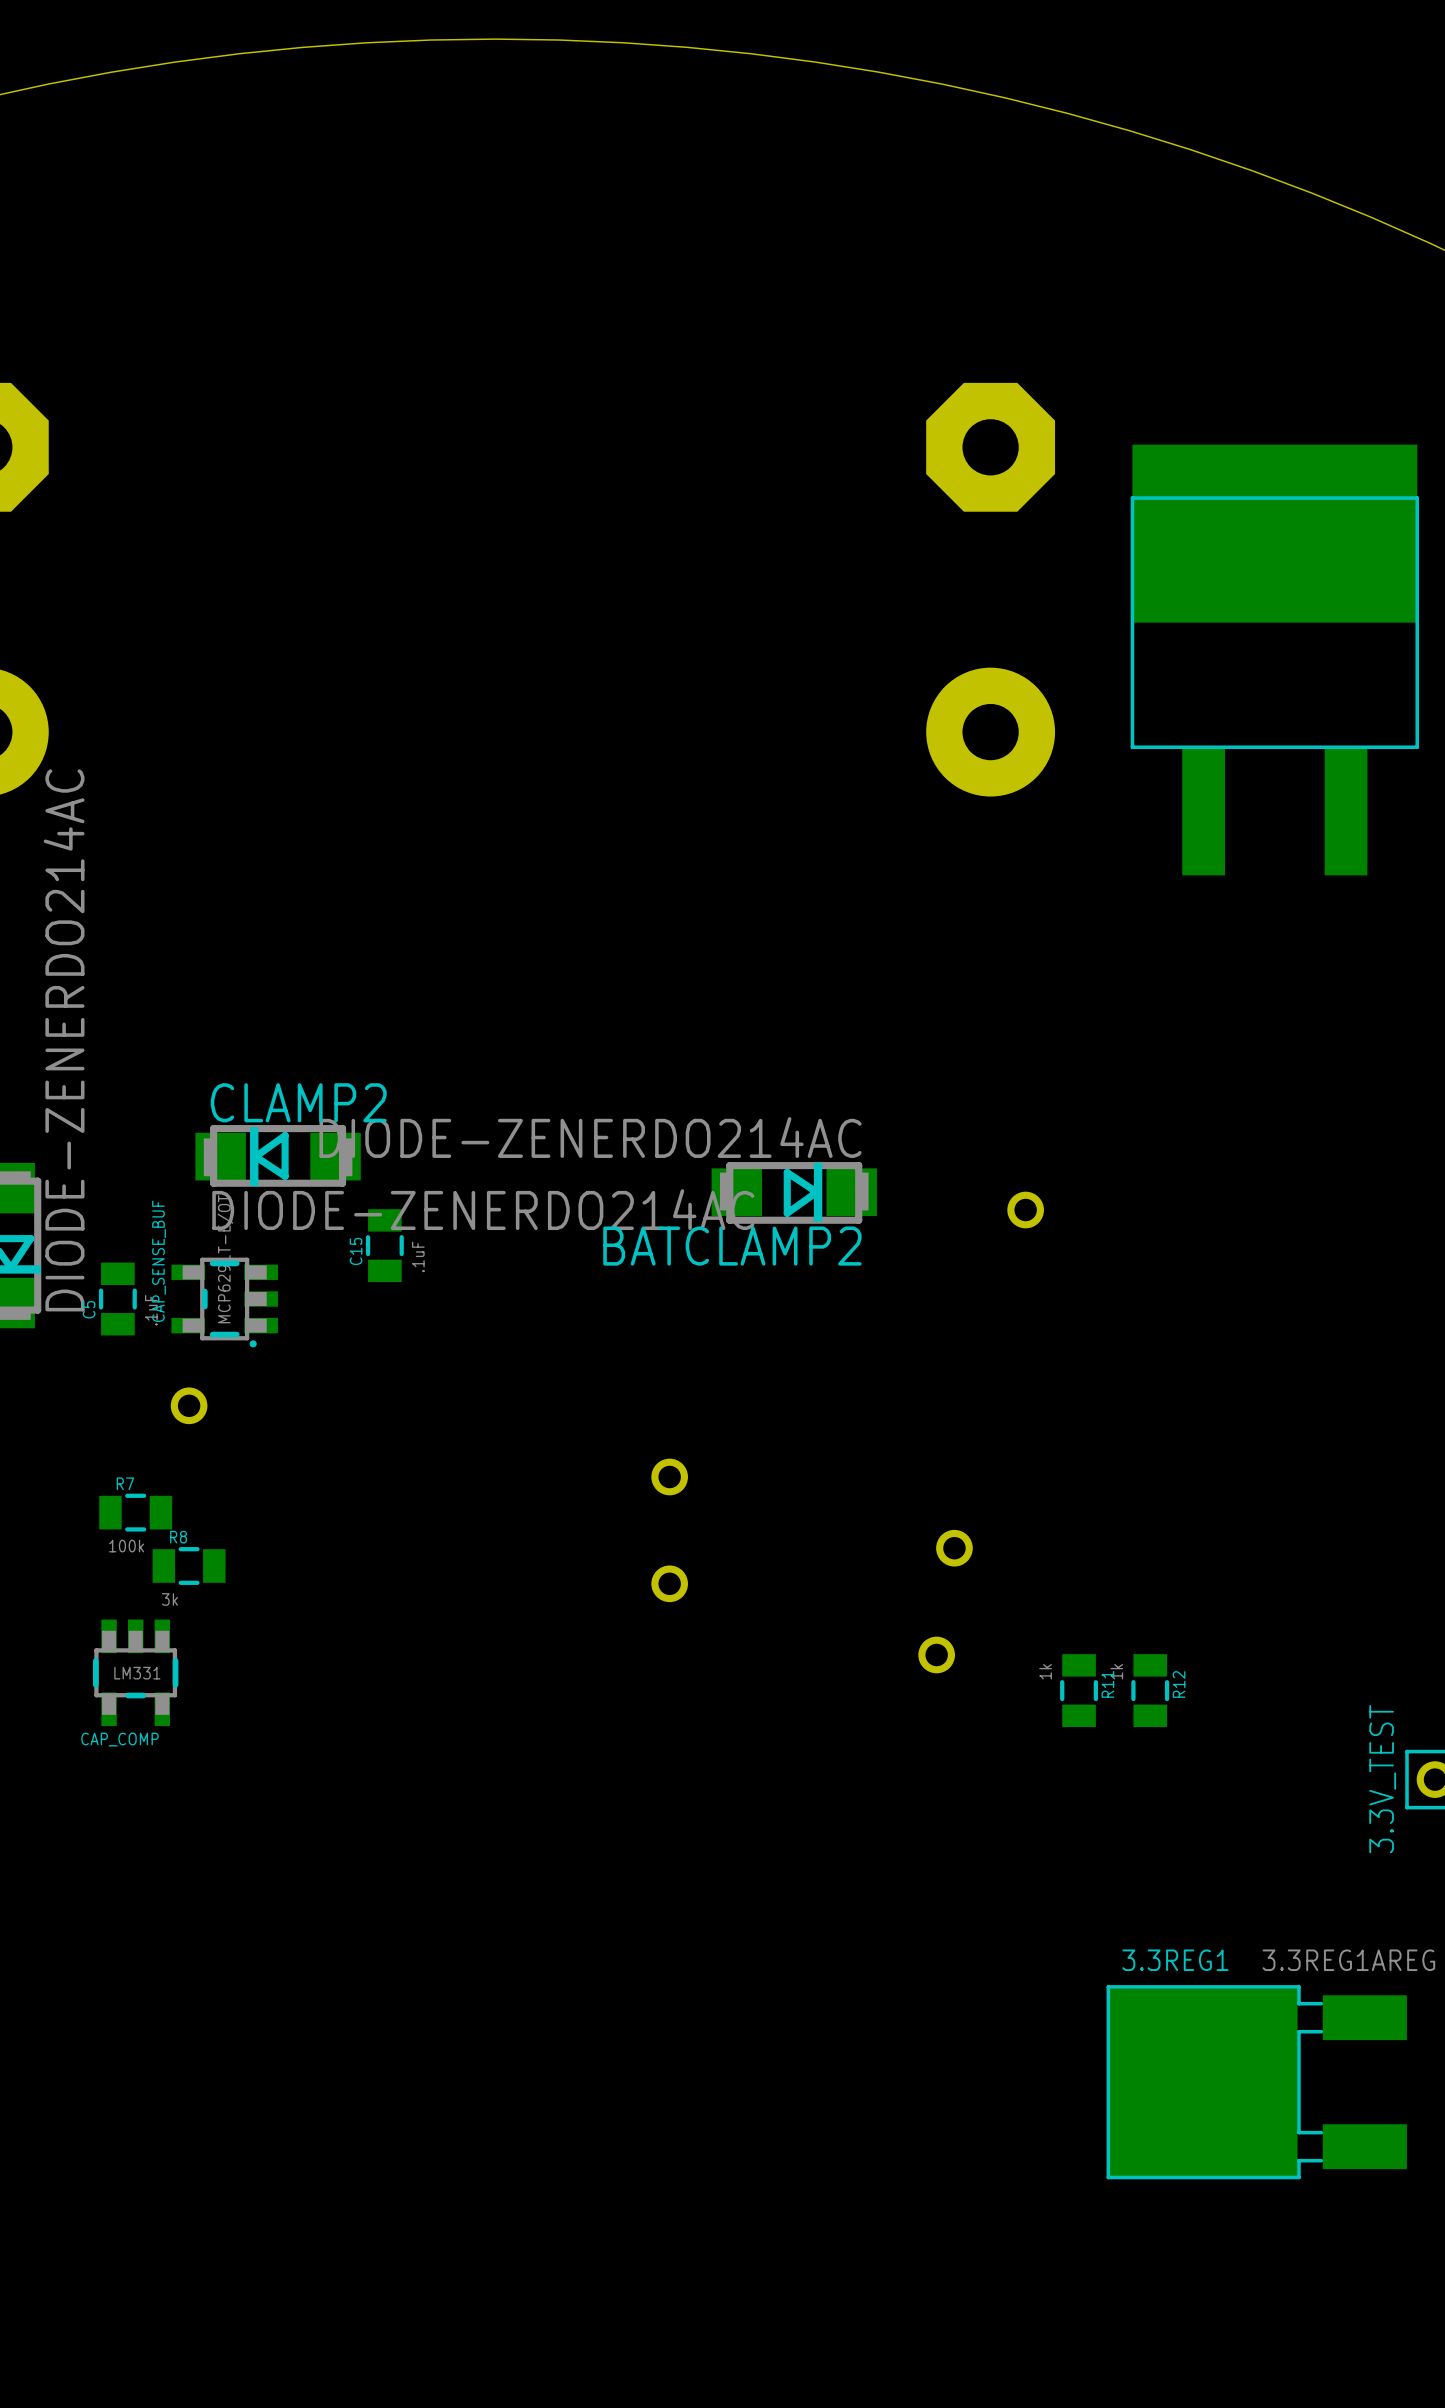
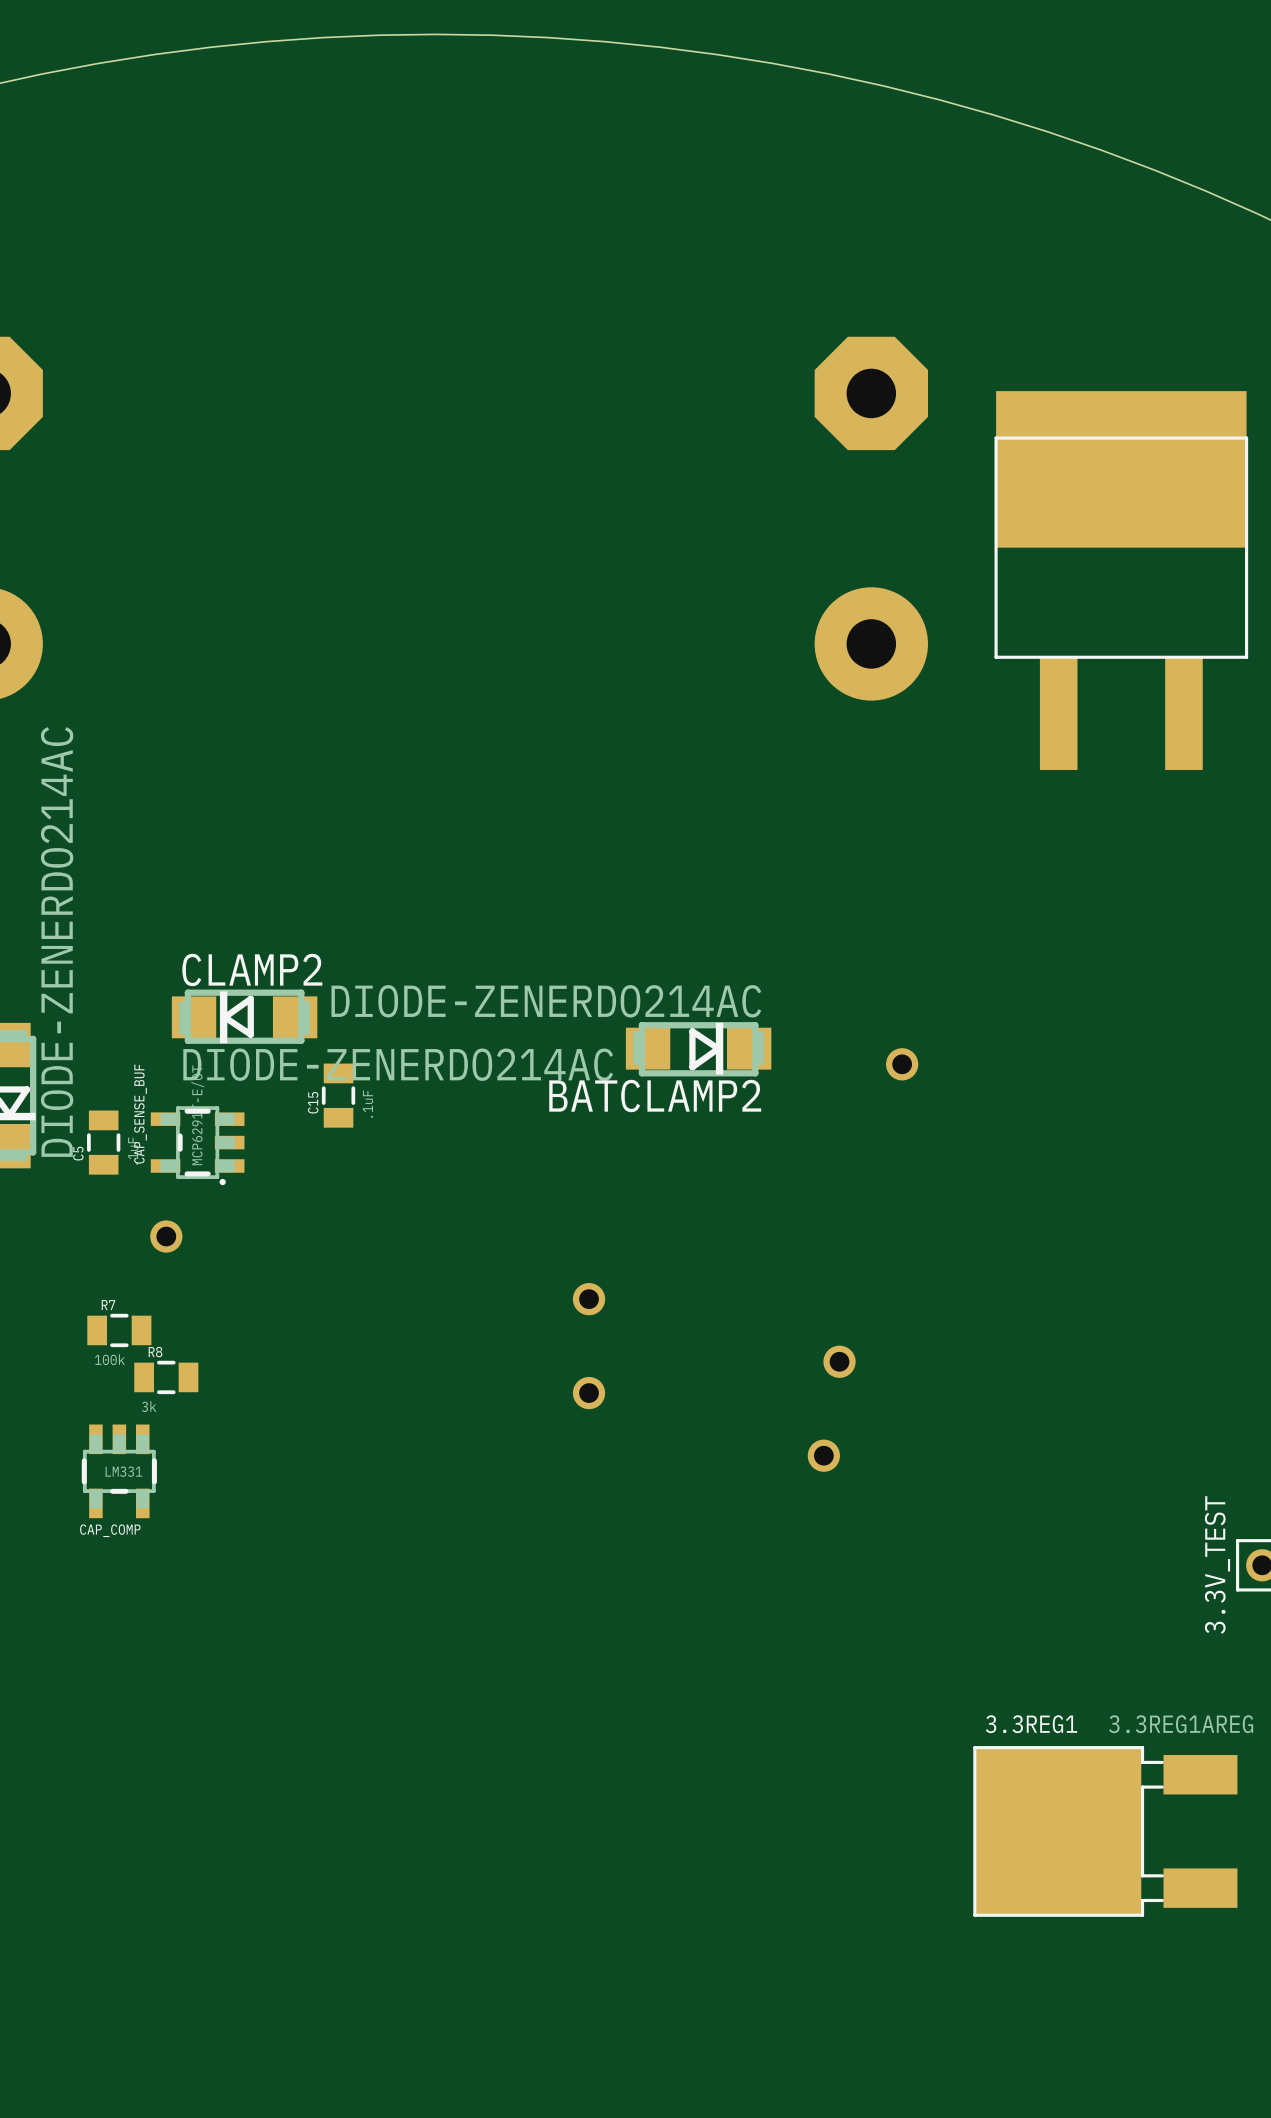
R11: 1k (1079, 1690) -> none
R12: 1k (1150, 1690) -> none

